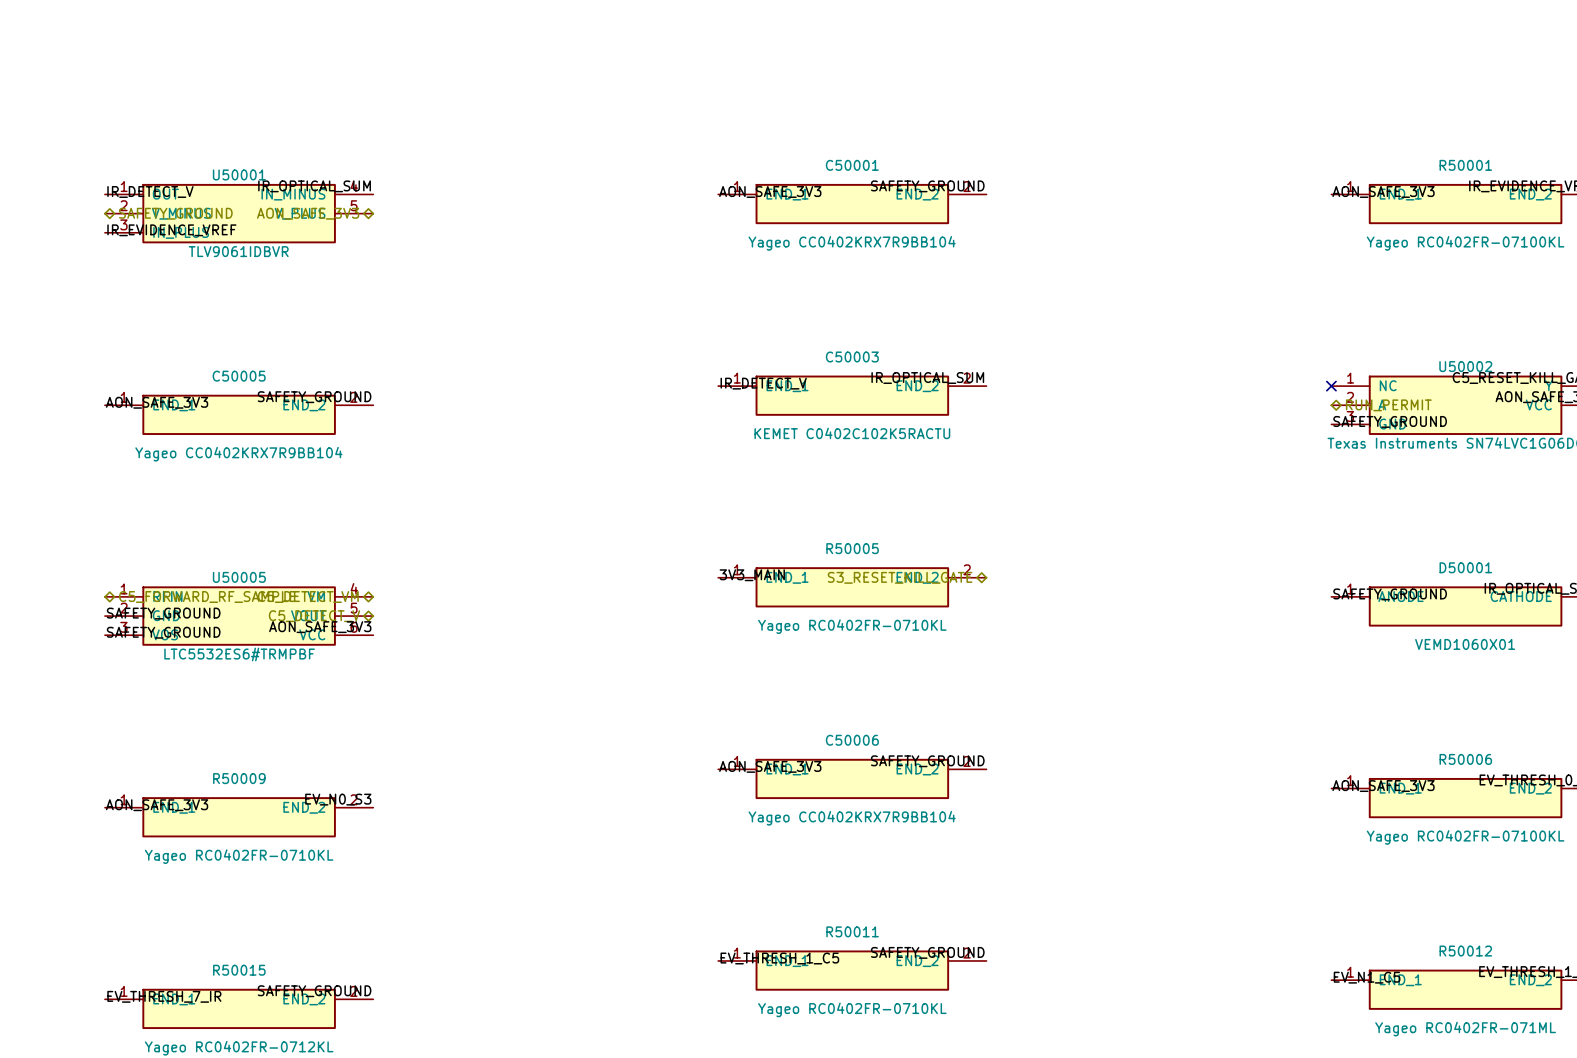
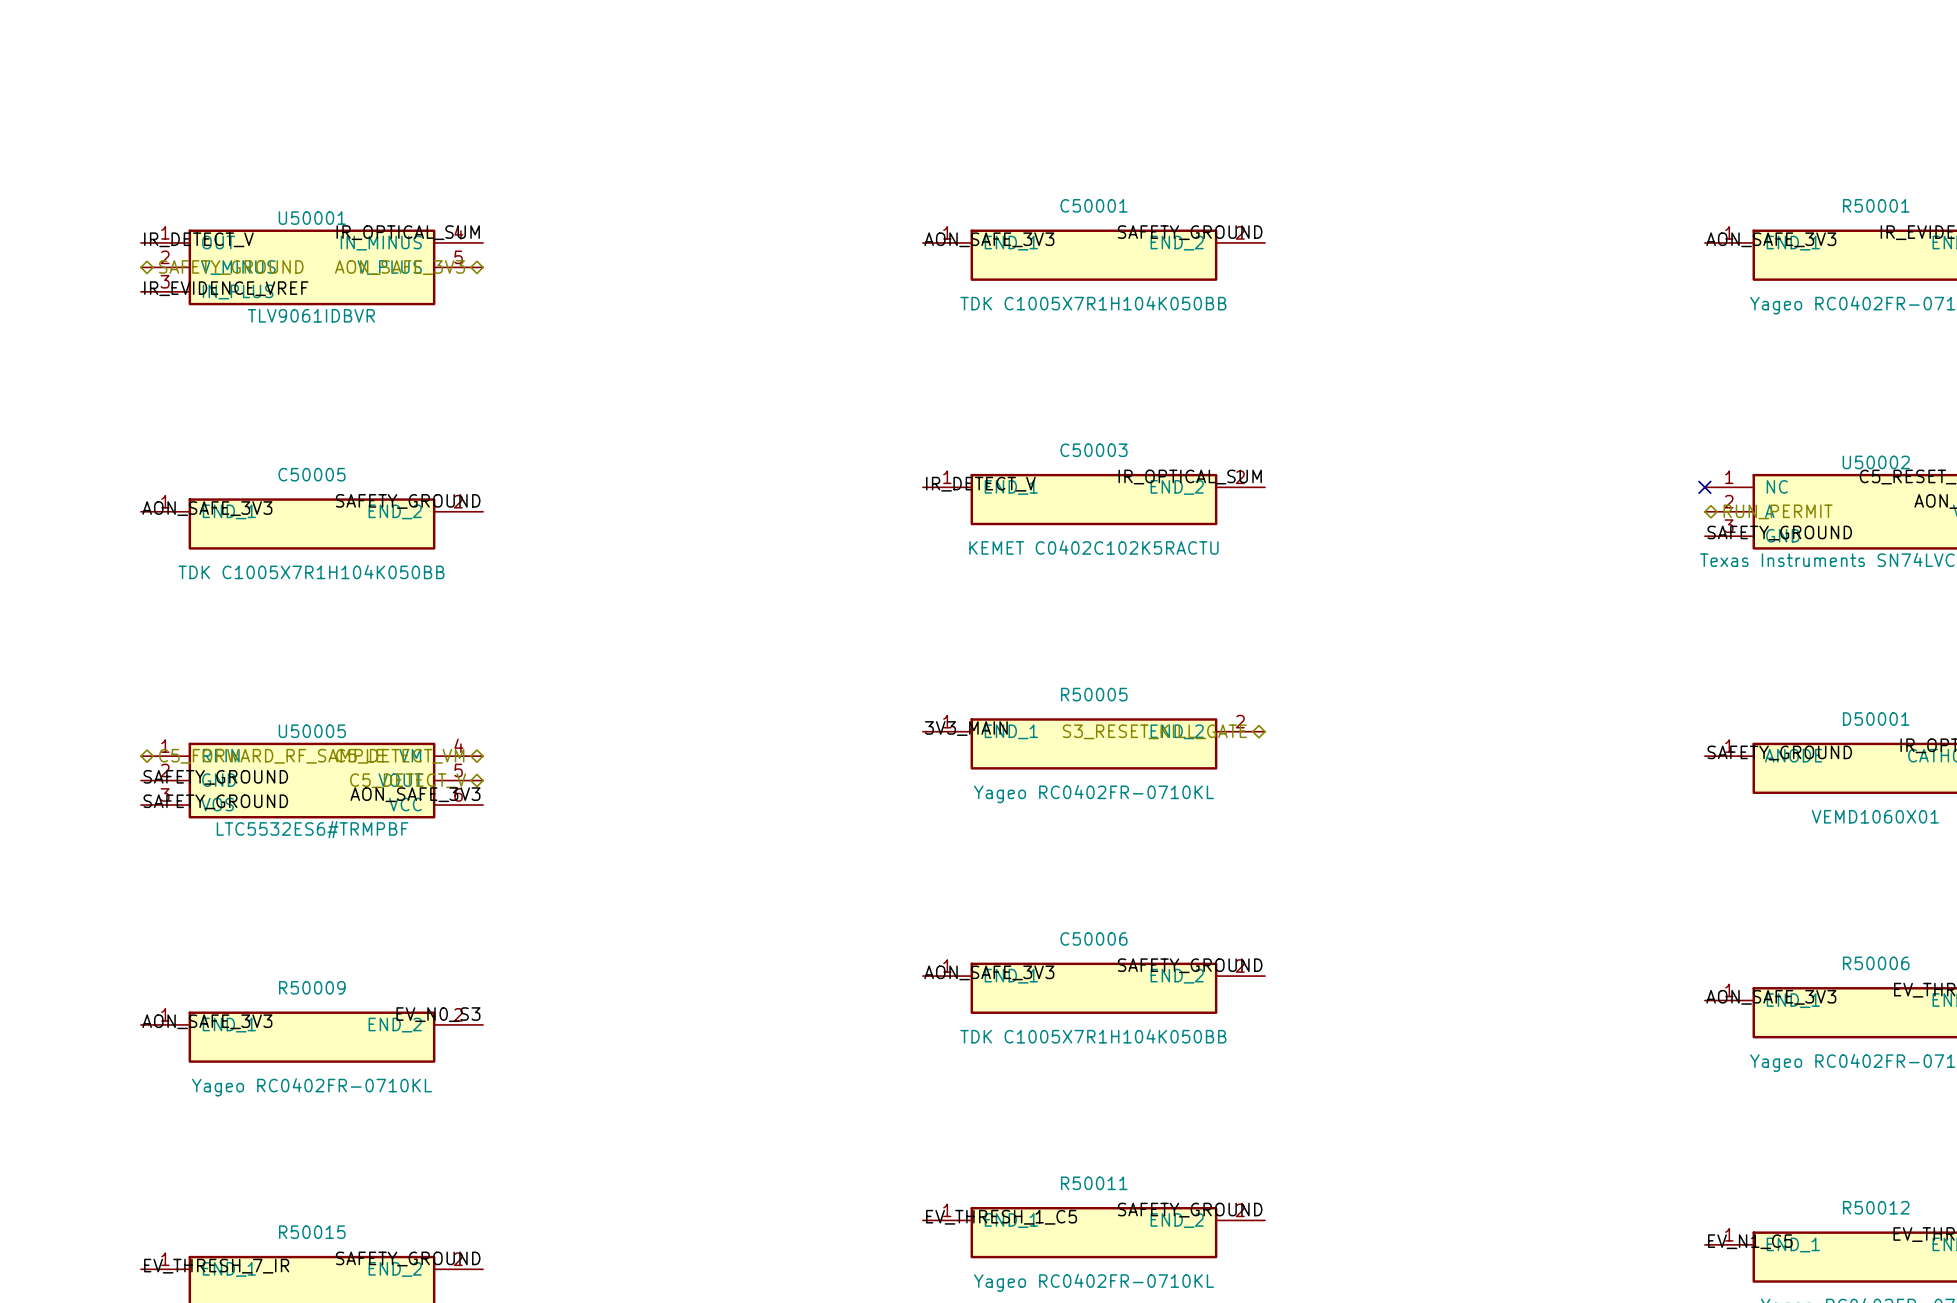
C50001 value: Yageo CC0402KRX7R9BB104 (852, 243) -> TDK C1005X7R1H104K050BB (1093, 303)
C50005 value: Yageo CC0402KRX7R9BB104 (238, 454) -> TDK C1005X7R1H104K050BB (311, 572)
C50006 value: Yageo CC0402KRX7R9BB104 (852, 818) -> TDK C1005X7R1H104K050BB (1093, 1036)

